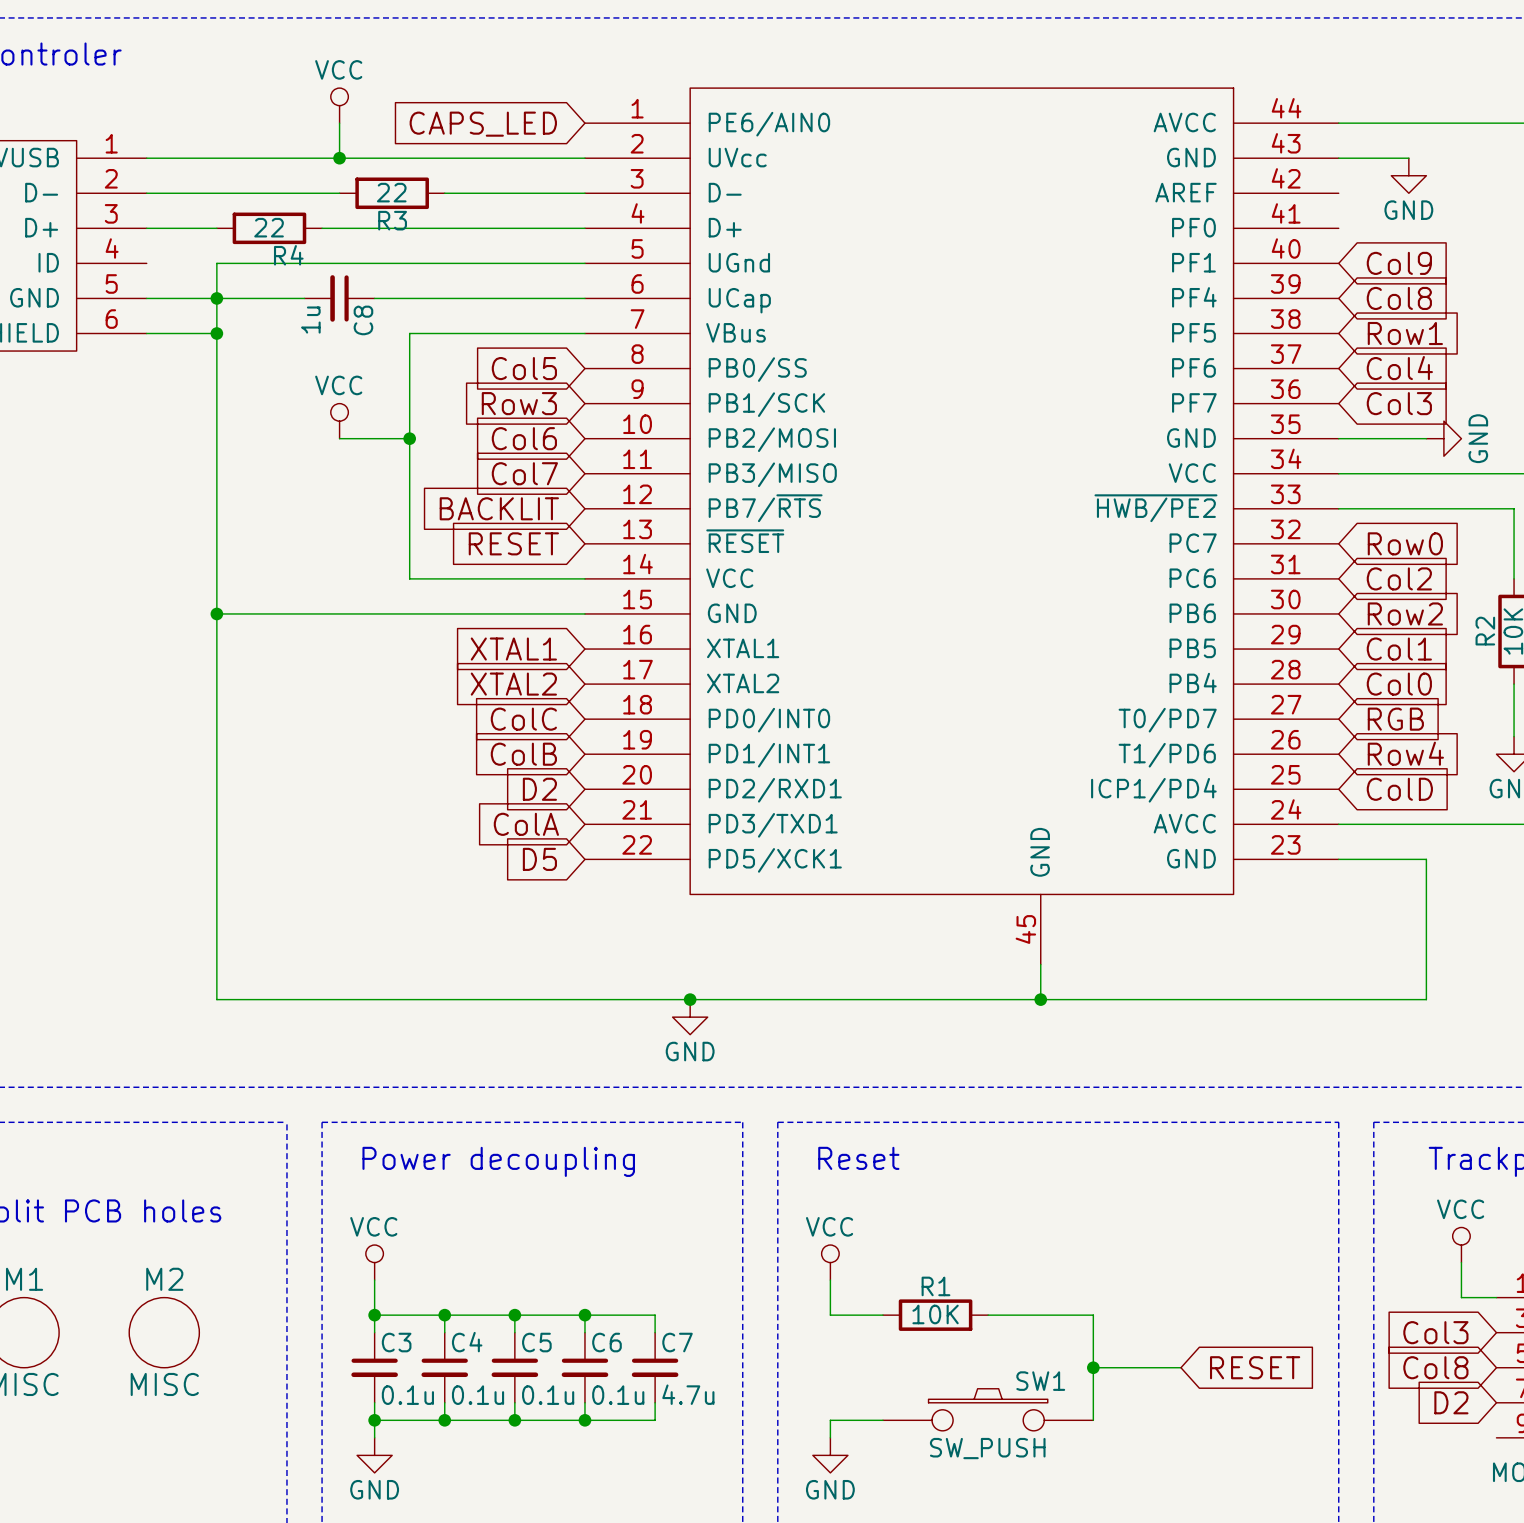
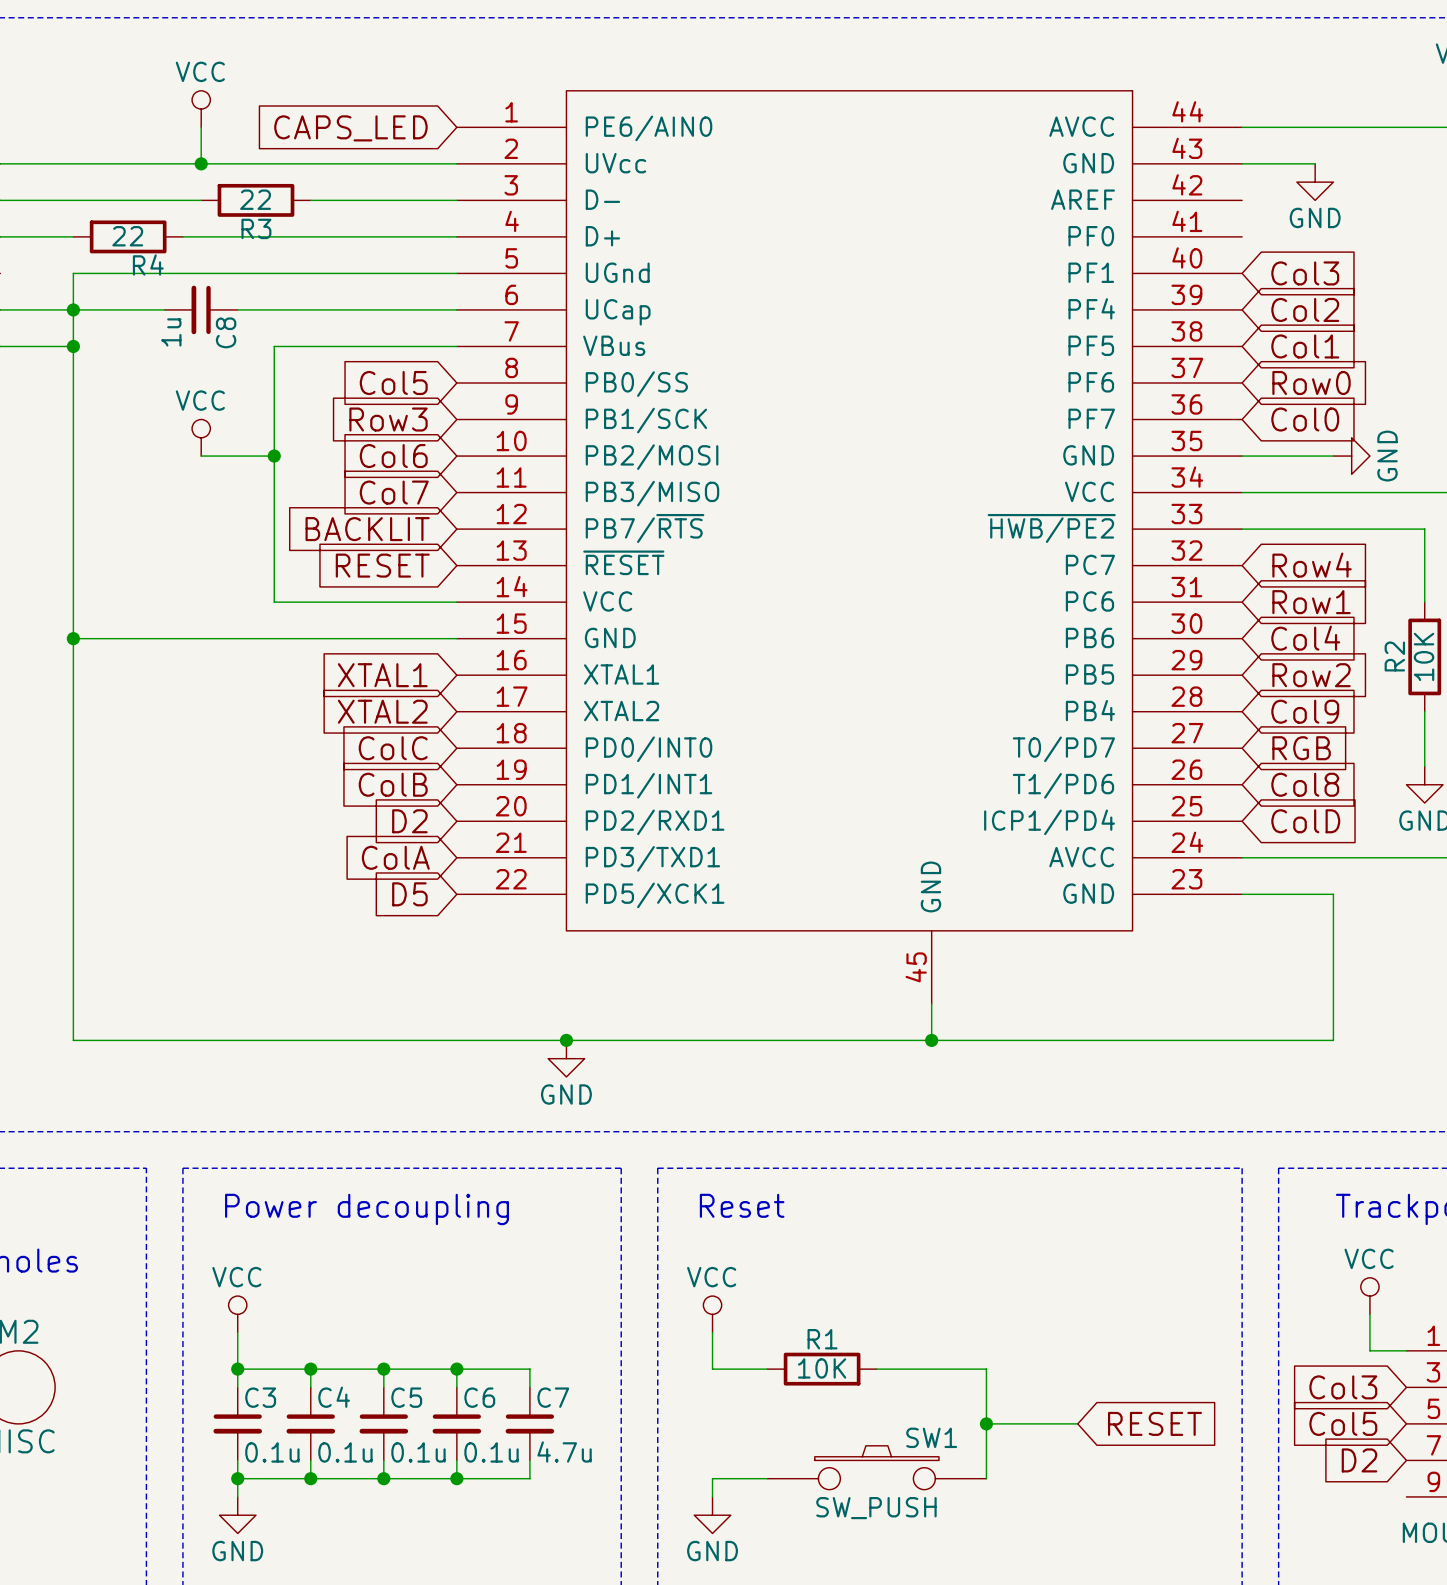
global label: Col9 (1399, 263) -> Col3 (1305, 273)
global label: Col8 (1399, 298) -> Col2 (1305, 309)
global label: Row1 (1405, 333) -> Col1 (1305, 346)
global label: Col4 (1399, 368) -> Row0 (1311, 383)
global label: Col3 (1399, 403) -> Col0 (1305, 419)
global label: Row0 (1405, 543) -> Row4 (1312, 565)
global label: Col2 (1399, 578) -> Row1 (1311, 602)
global label: Row2 (1405, 613) -> Col4 (1305, 638)
global label: Col1 (1399, 649) -> Row2 (1311, 675)
global label: Col0 (1399, 684) -> Col9 (1305, 711)
global label: Row4 (1405, 753) -> Col8 (1305, 784)
global label: Col8 (1435, 1367) -> Col5 (1343, 1423)

